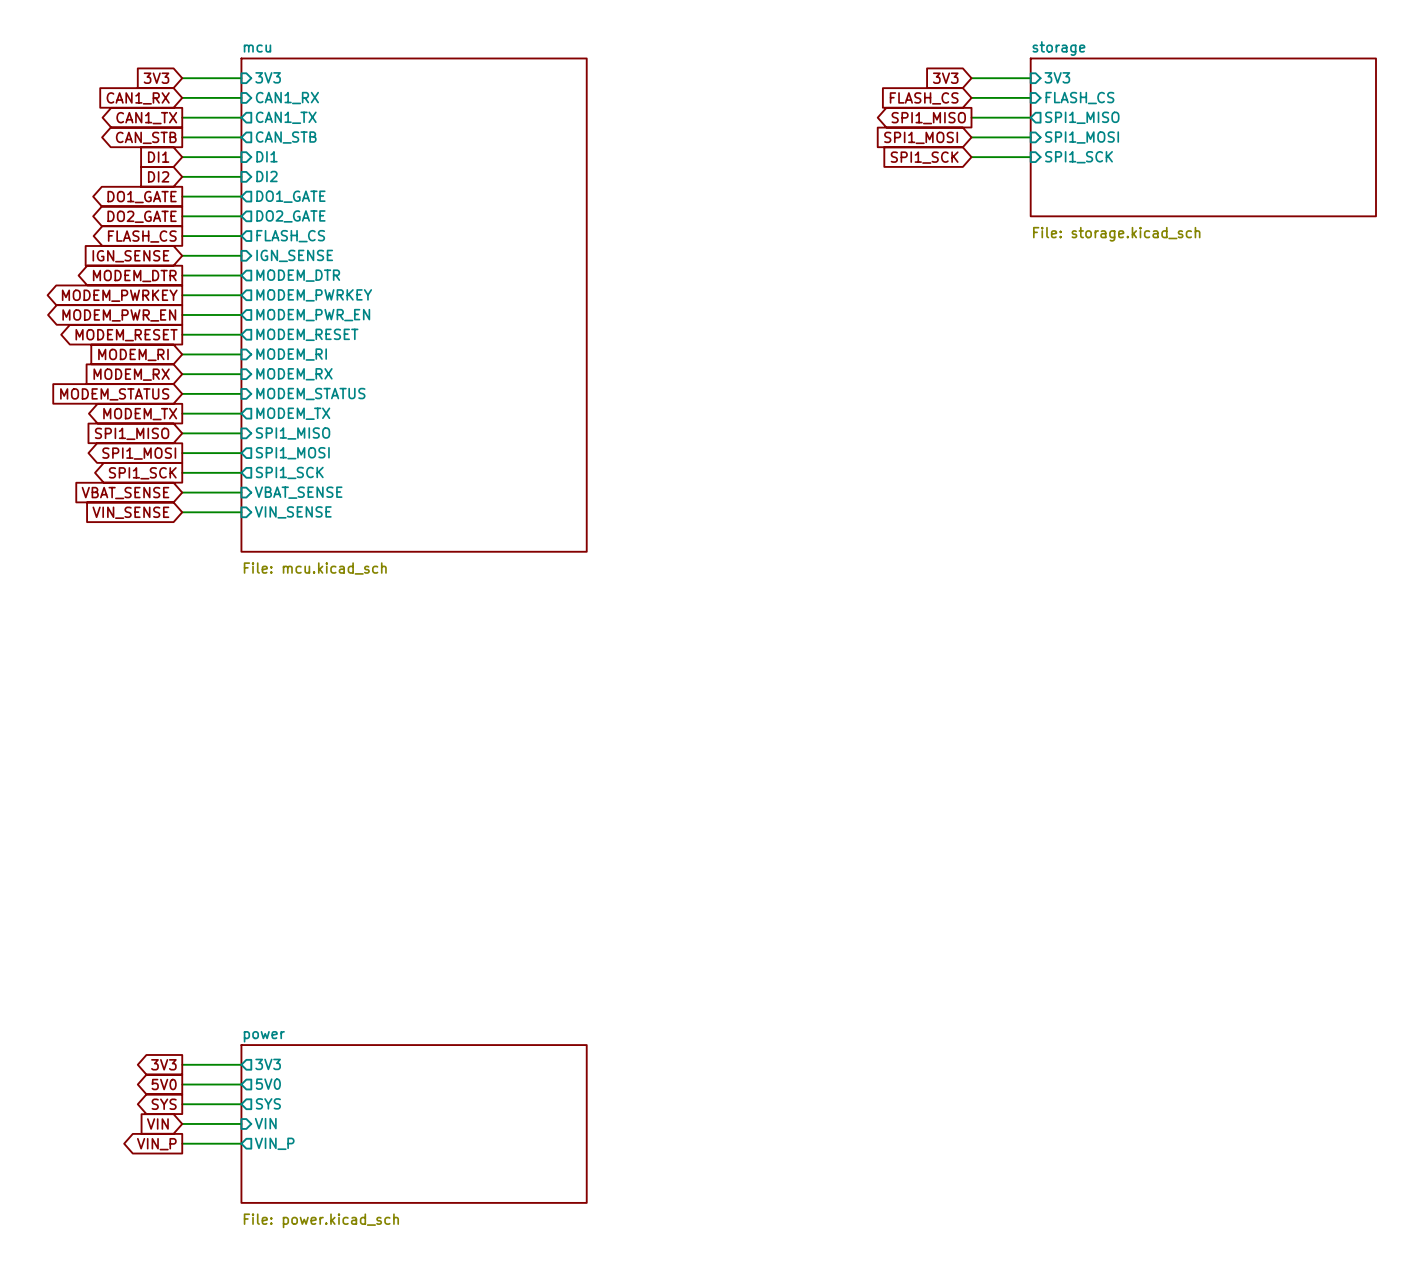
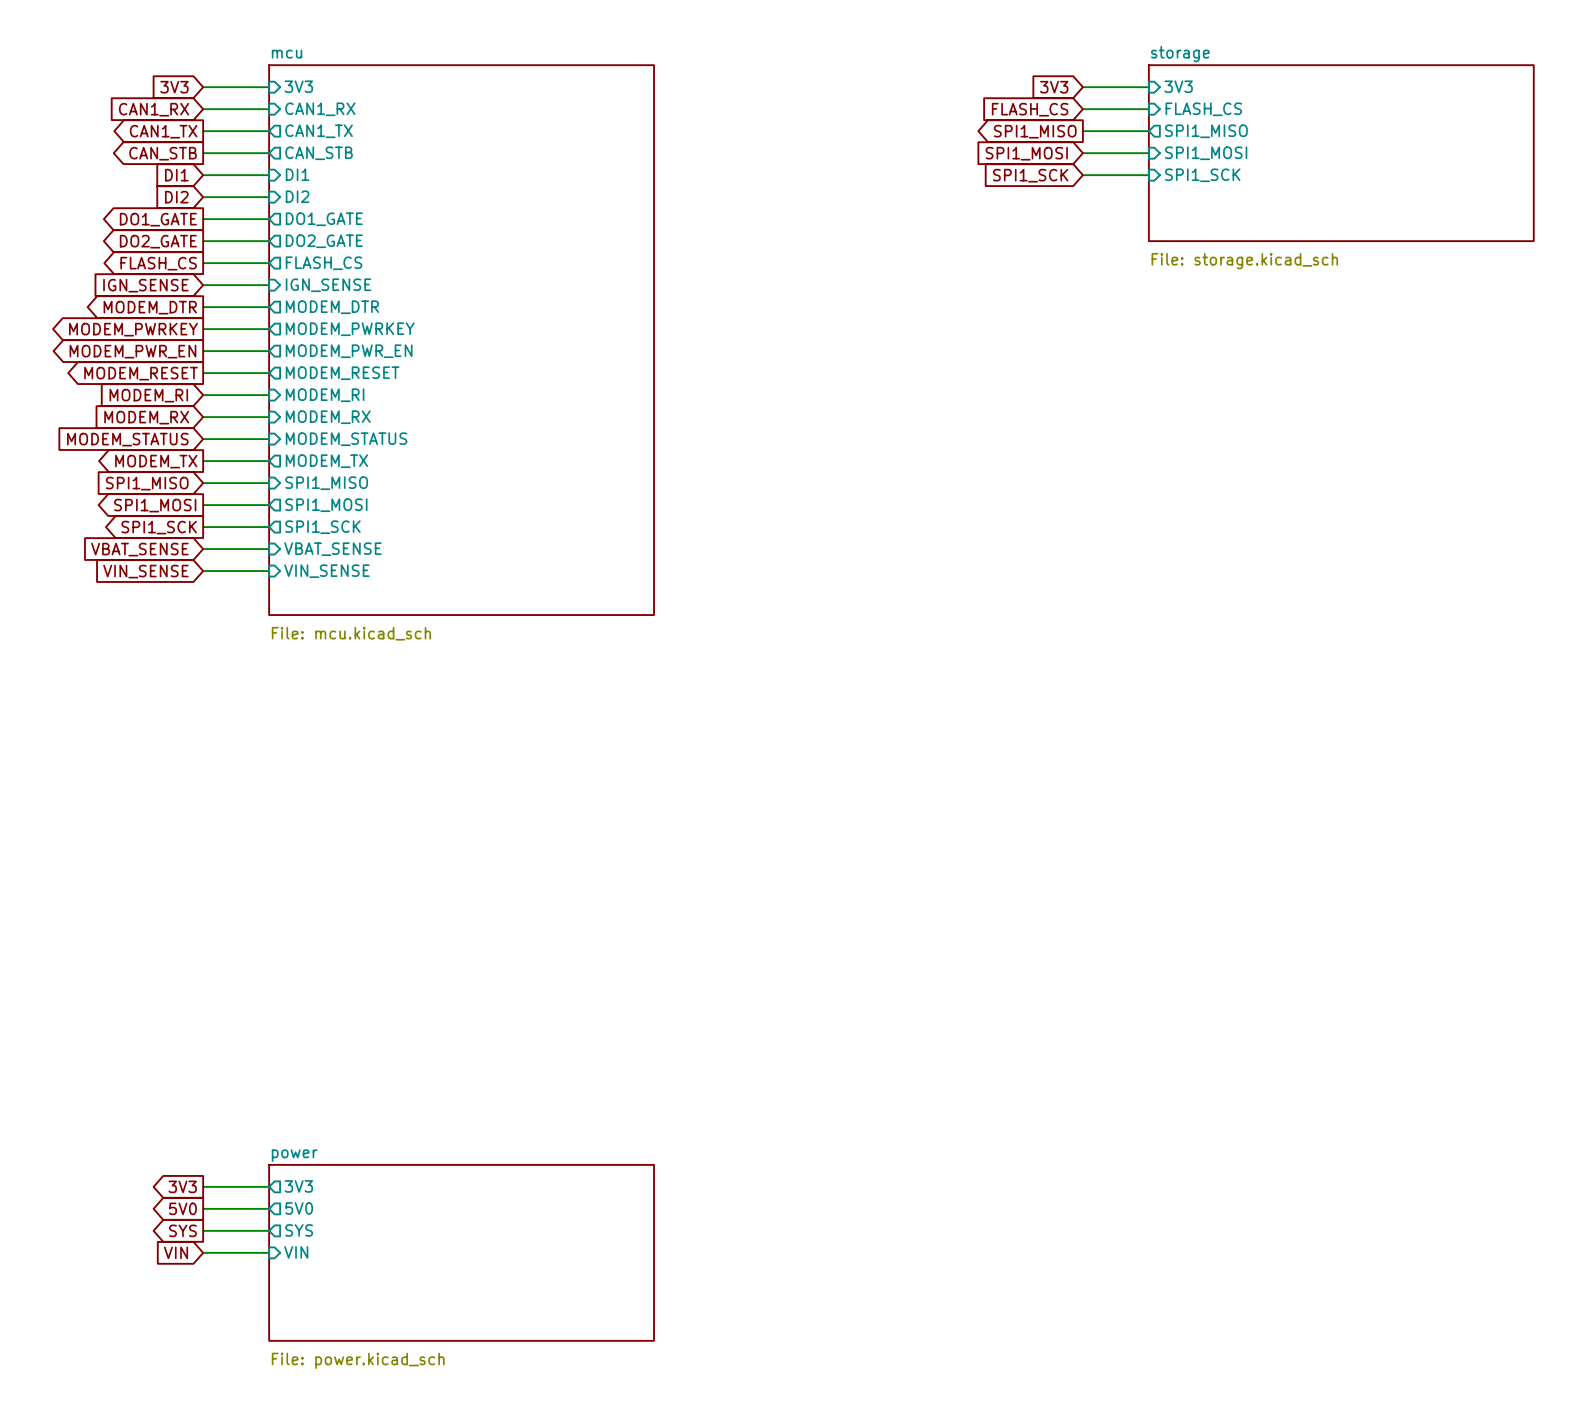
wire: (182, 1143) (241, 1143) -> none
sheet pin: VIN_P (274, 1143) -> none
global label: VIN_P (156, 1144) -> none

